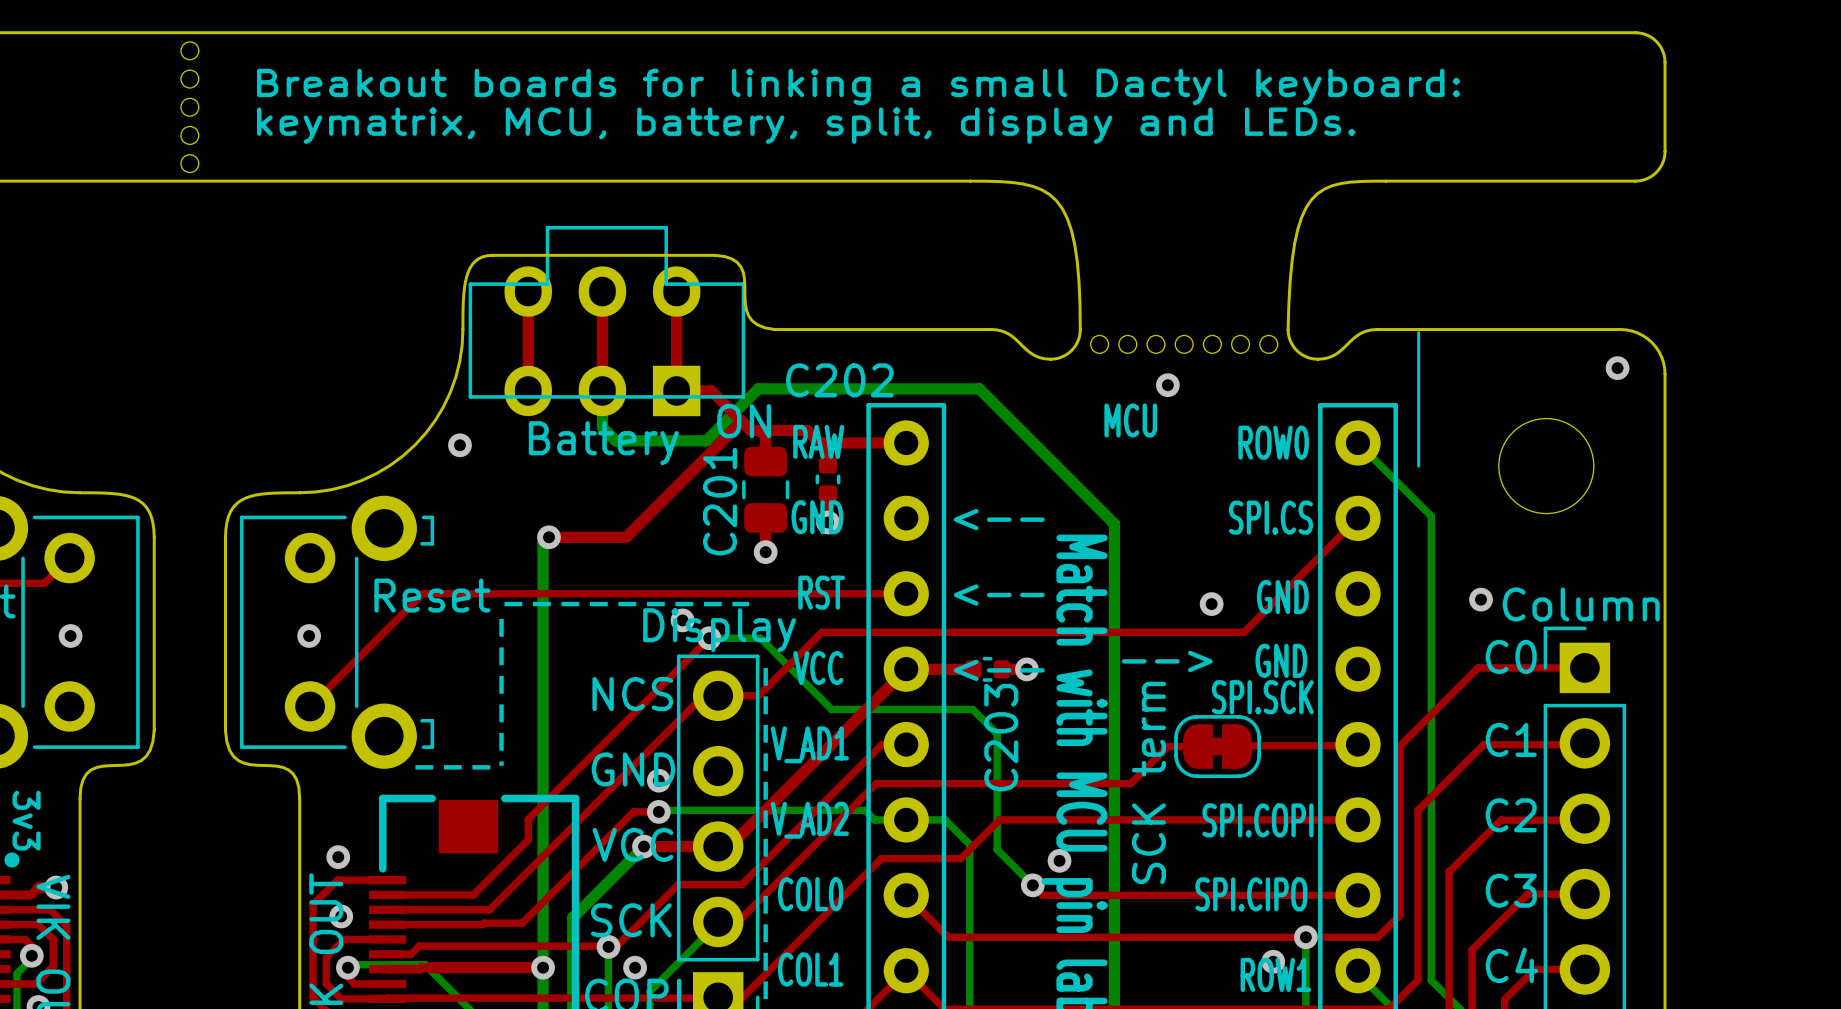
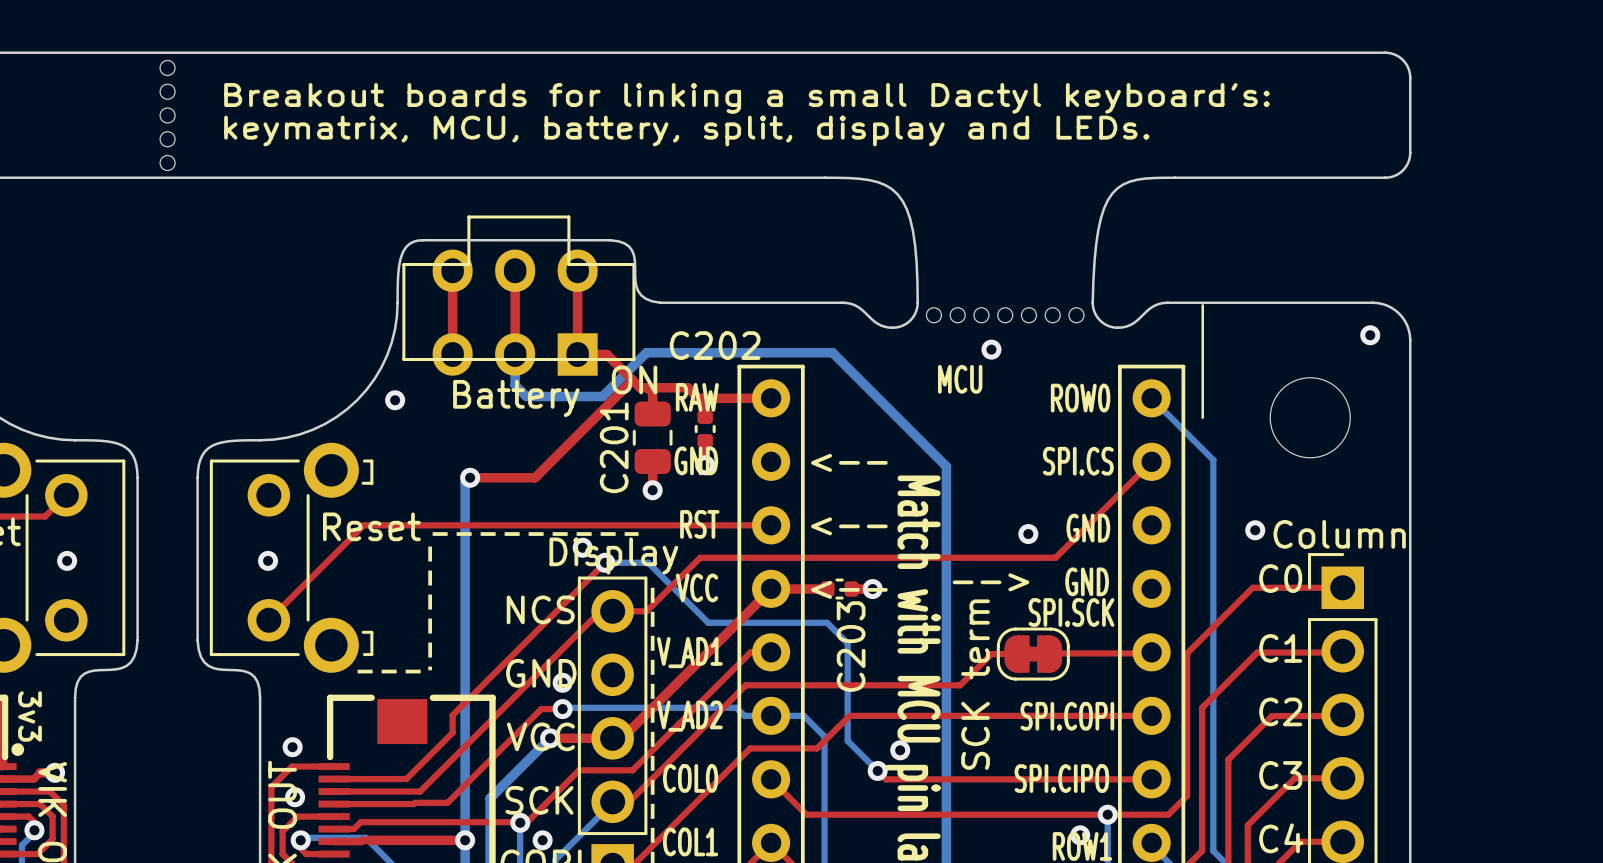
text: Breakout boards for linking a small Dactyl keyboard: (858, 86) -> Breakout boards for linking a small Dactyl keyboard's: (746, 98)

